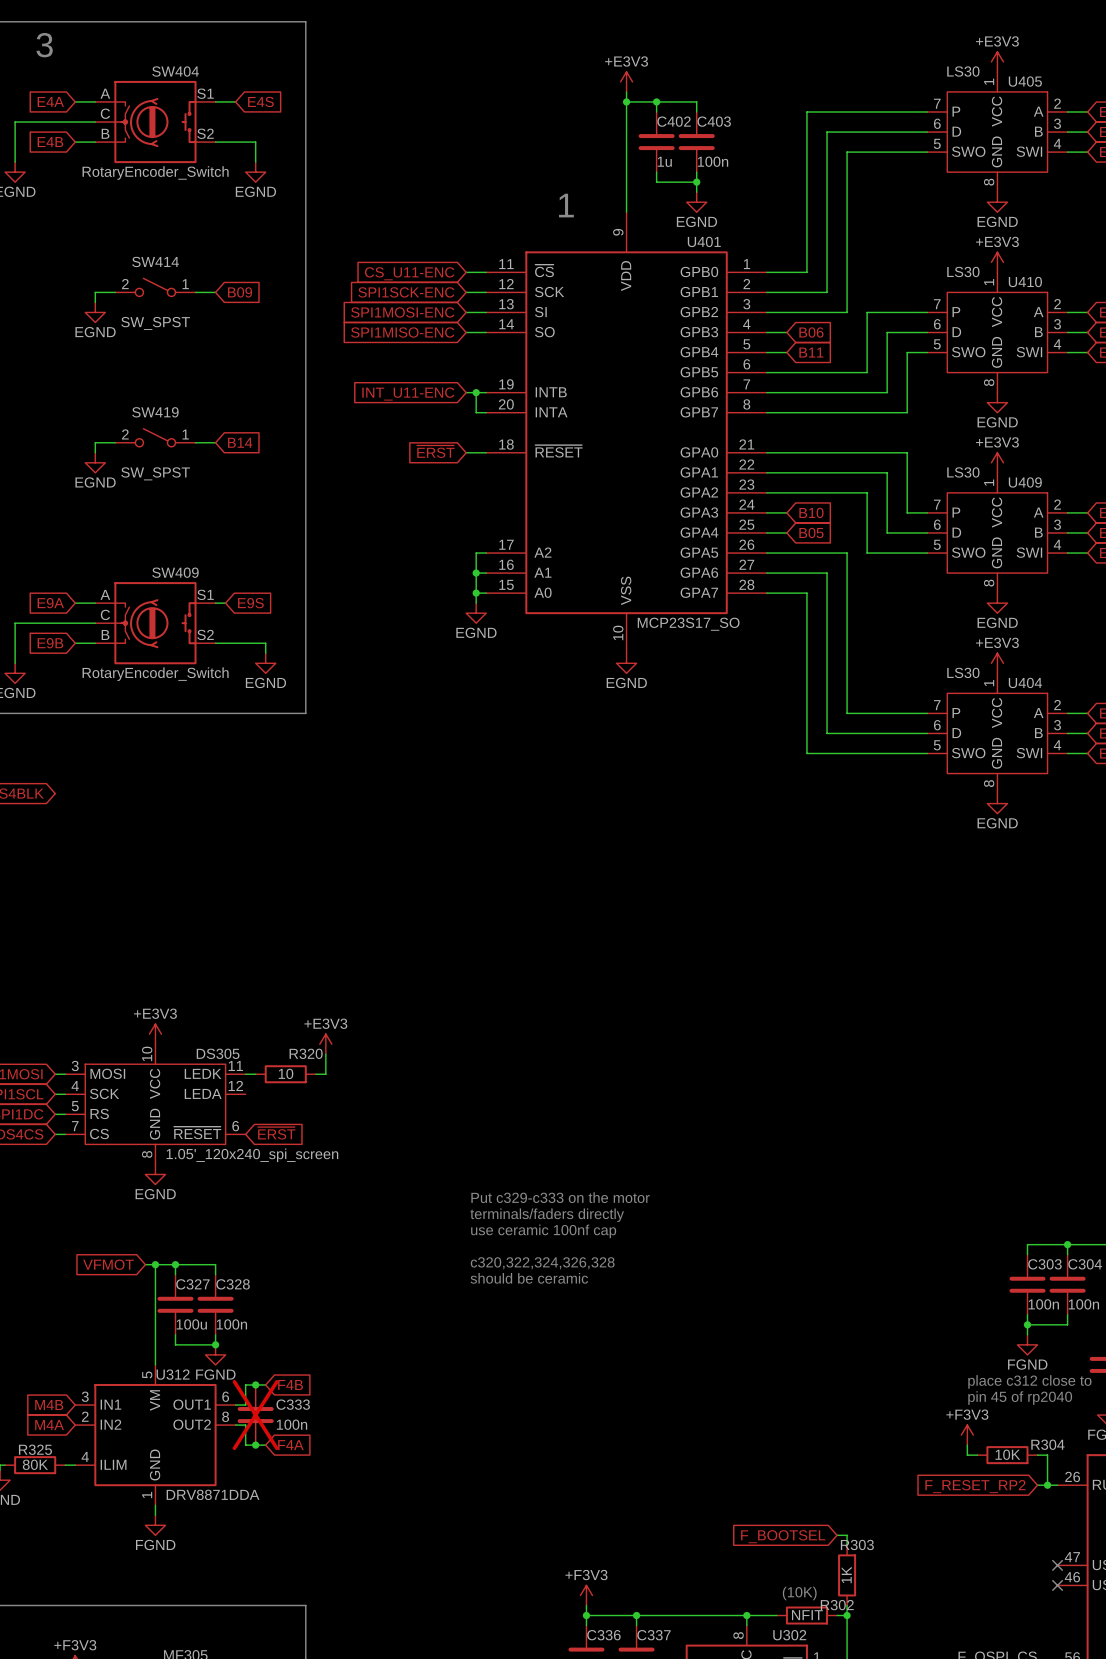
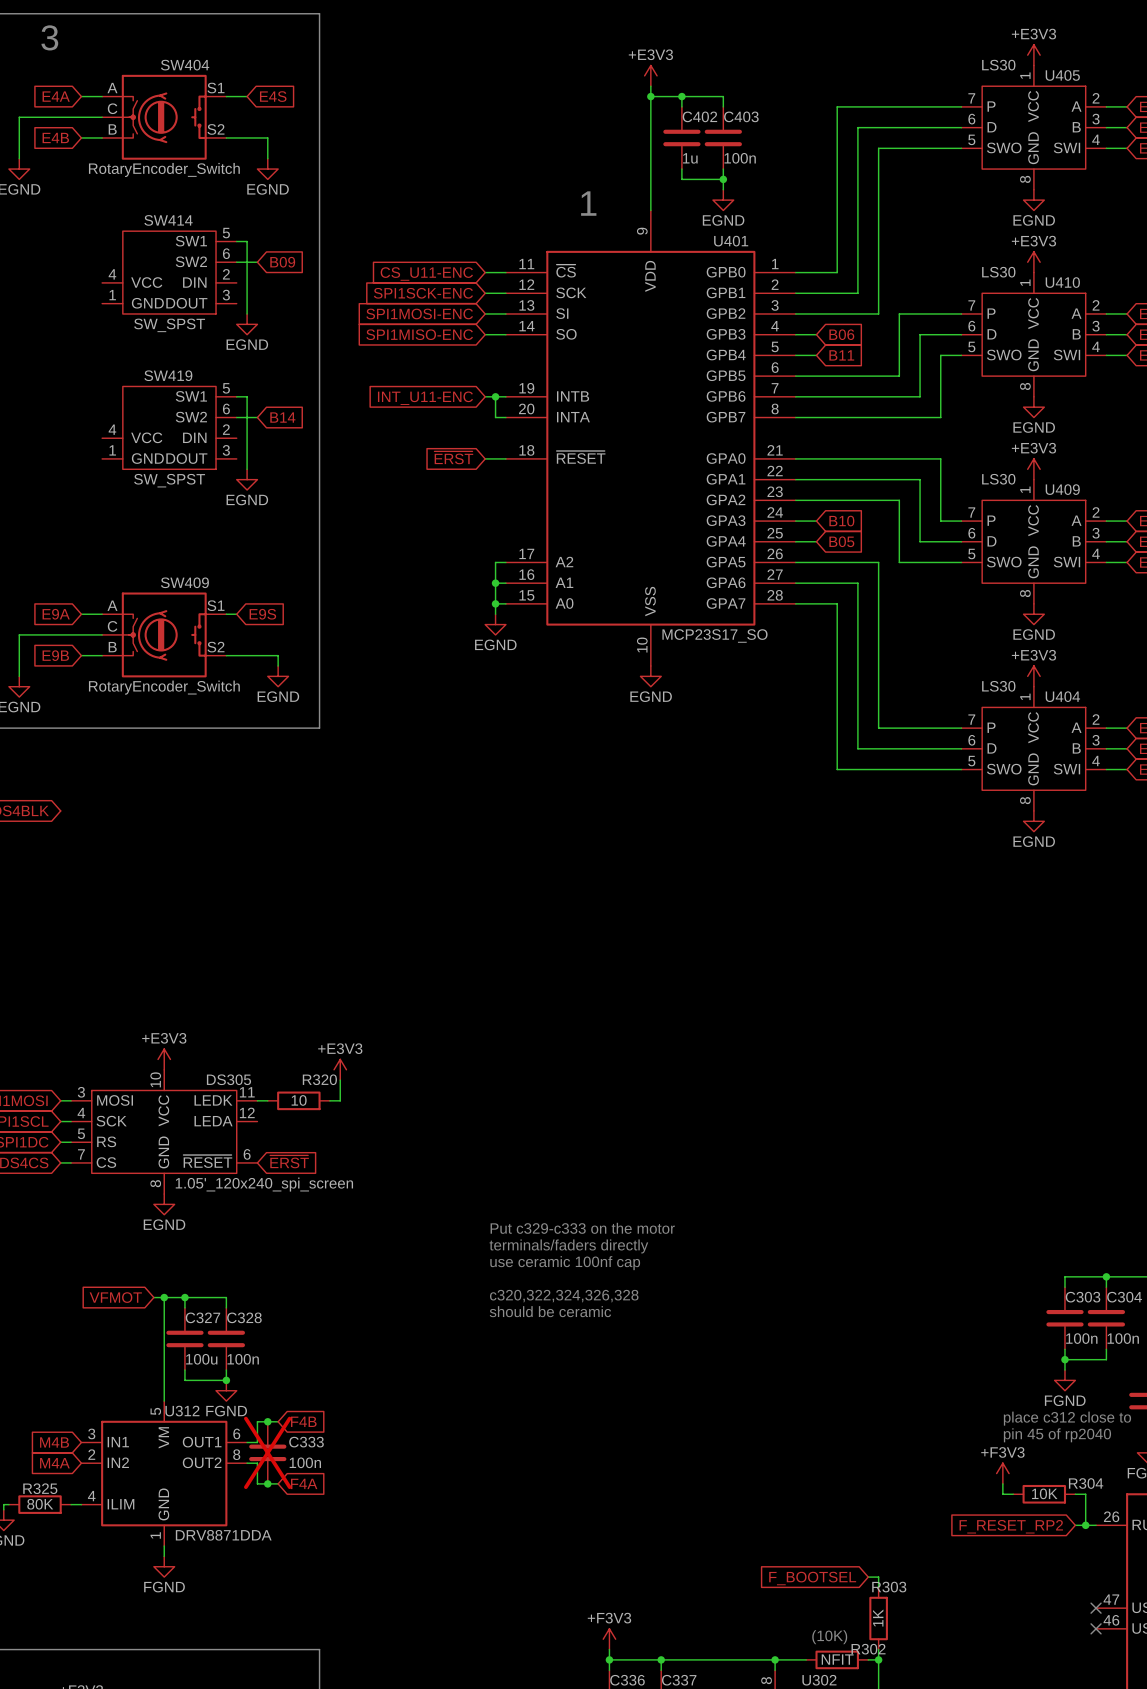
wire: none -> (236, 241) (247, 241) (247, 313)
SW414 name position: SW414 (155, 261) -> SW414 (168, 220)
SW414 symbol: [115, 278, 196, 297] -> [102, 231, 237, 314]
wire: (115, 292) (95, 292) (95, 302) -> none
wire: (195, 292) (215, 292) -> (236, 262) (257, 262)
global label position: B09 (240, 292) -> B09 (282, 262)
power symbol: EGND (95, 312) -> none
power symbol: none -> EGND (247, 324)
wire: none -> (236, 396) (247, 396) (247, 469)
SW419 name position: SW419 (155, 412) -> SW419 (168, 375)
SW419 symbol: [115, 428, 196, 447] -> [102, 386, 237, 470]
wire: (115, 442) (95, 442) (95, 452) -> none
wire: (195, 442) (215, 442) -> (236, 417) (257, 417)
global label position: B14 (240, 442) -> B14 (282, 417)
power symbol: EGND (95, 462) -> none
power symbol: none -> EGND (247, 479)

